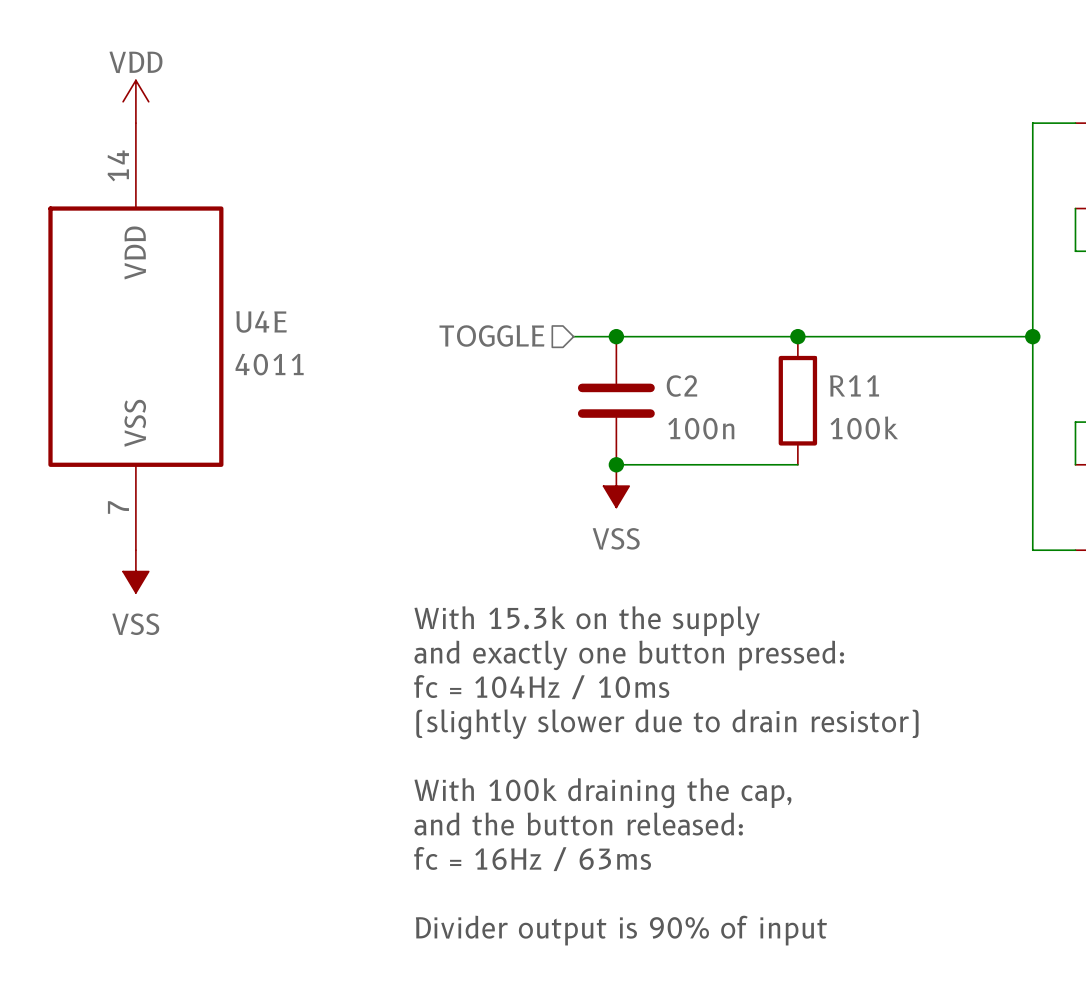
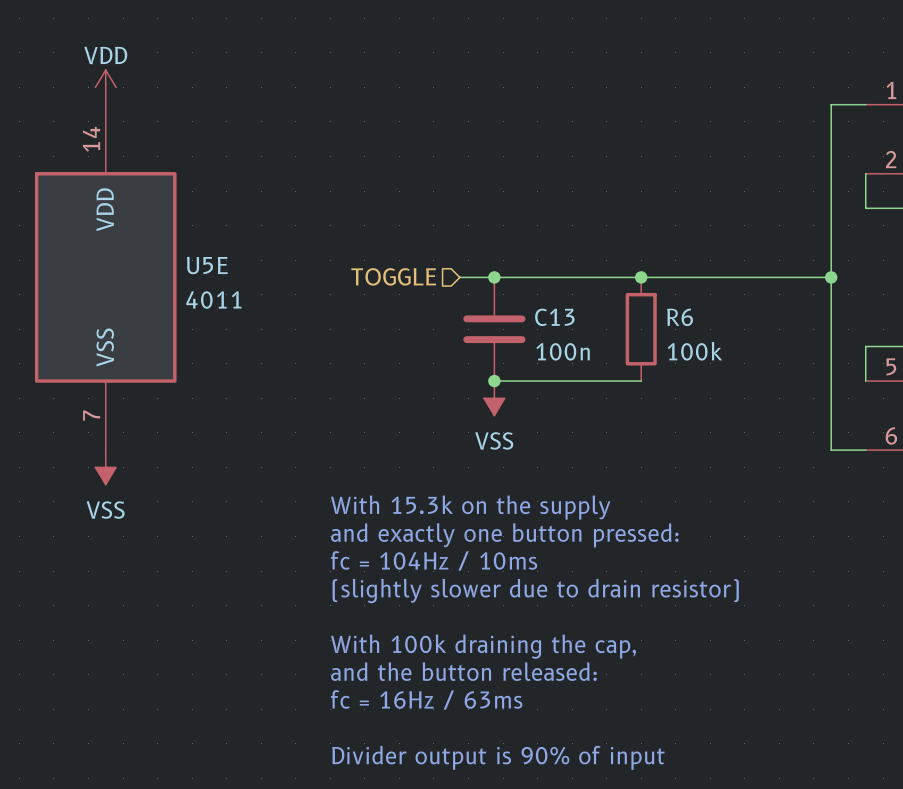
U4E name: U4E (261, 321) -> U5E (207, 265)
R11 name: R11 (854, 385) -> R6 (680, 317)
C2 name: C2 (681, 386) -> C13 (554, 317)

